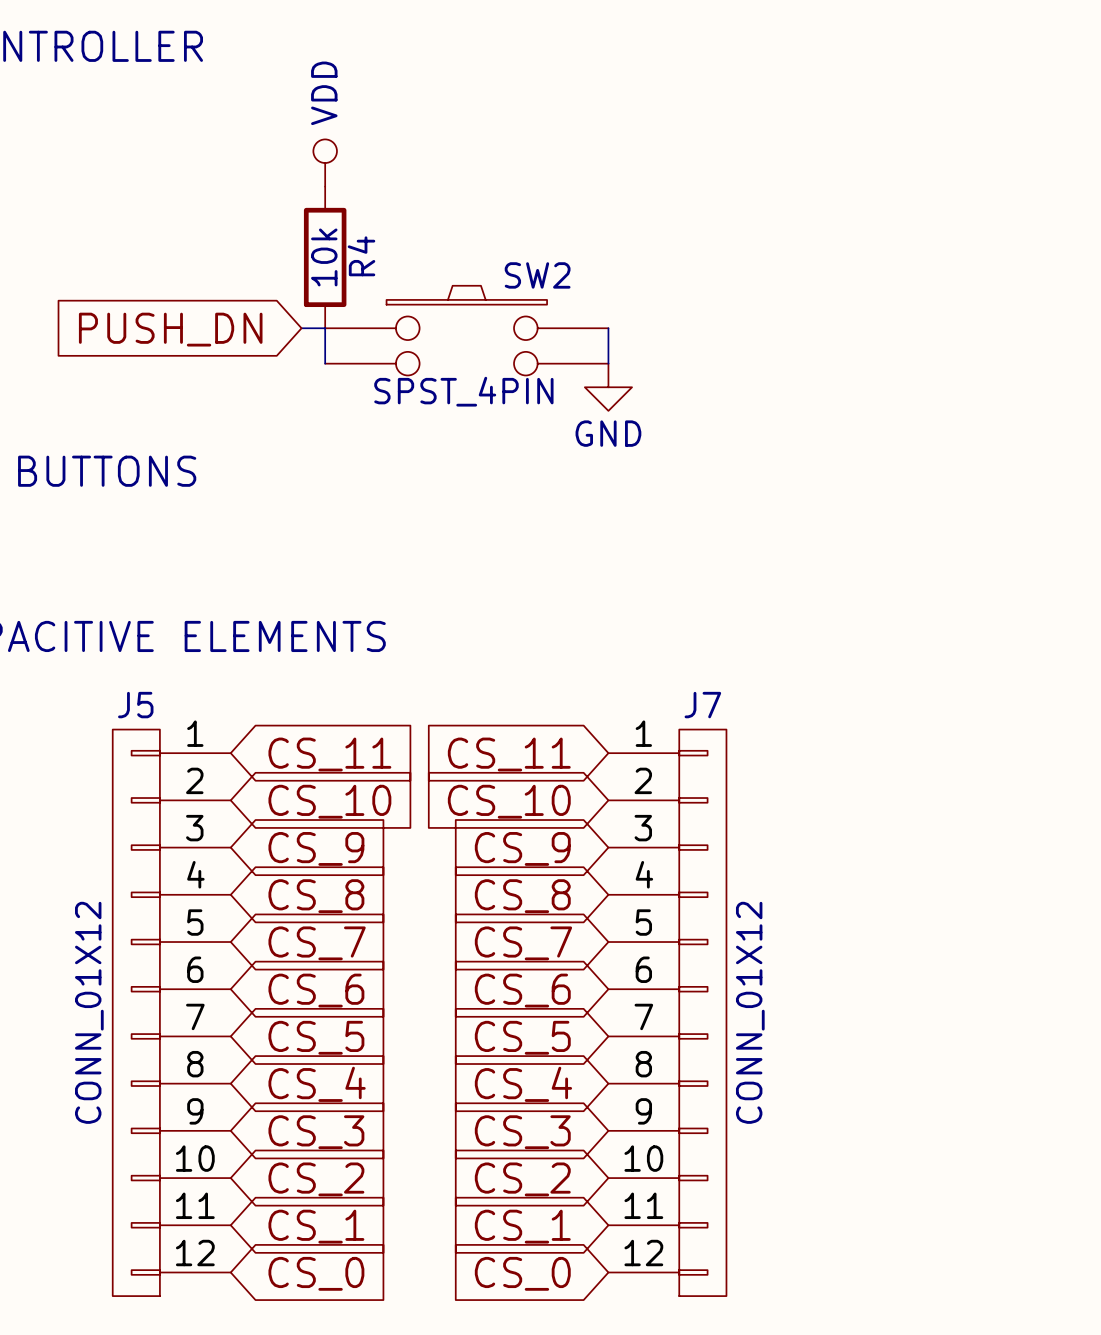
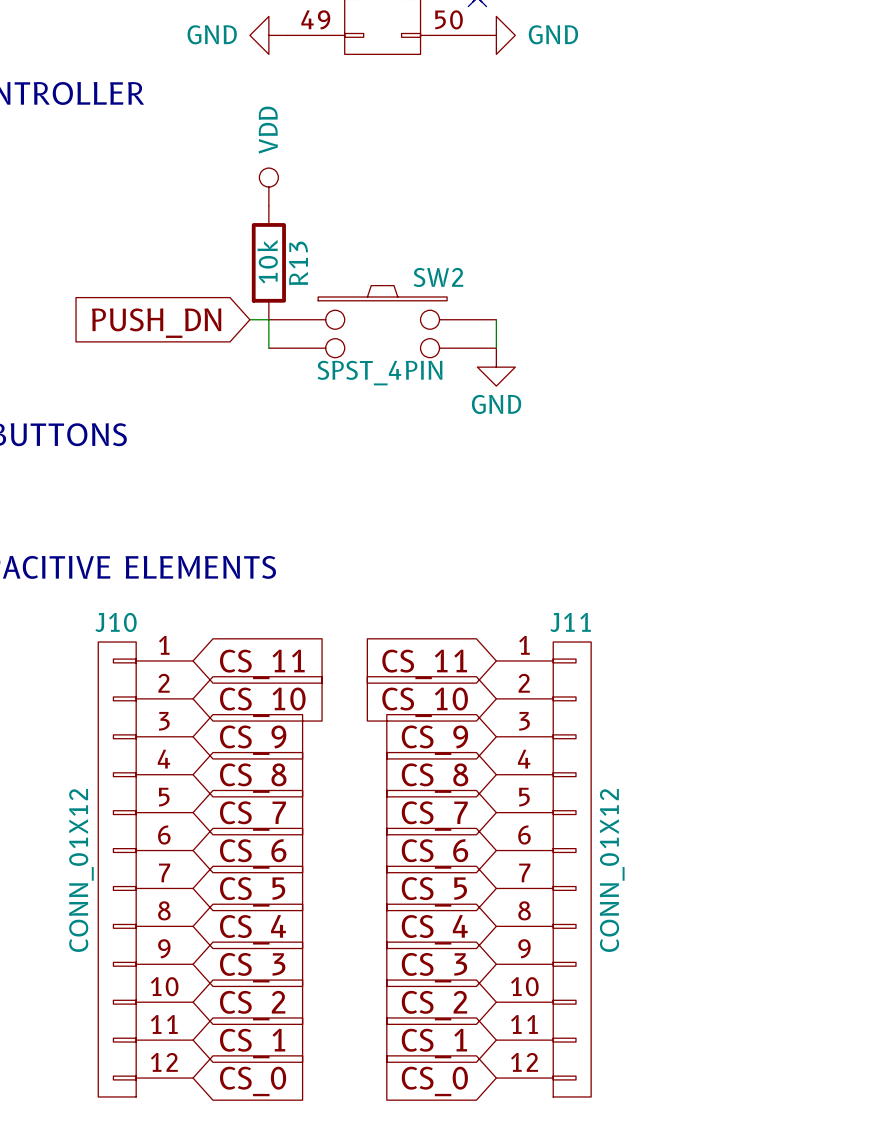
R4 name: R4 (361, 256) -> R13 (298, 263)
J5 name: J5 (135, 705) -> J10 (116, 622)
J7 name: J7 (702, 705) -> J11 (570, 622)

